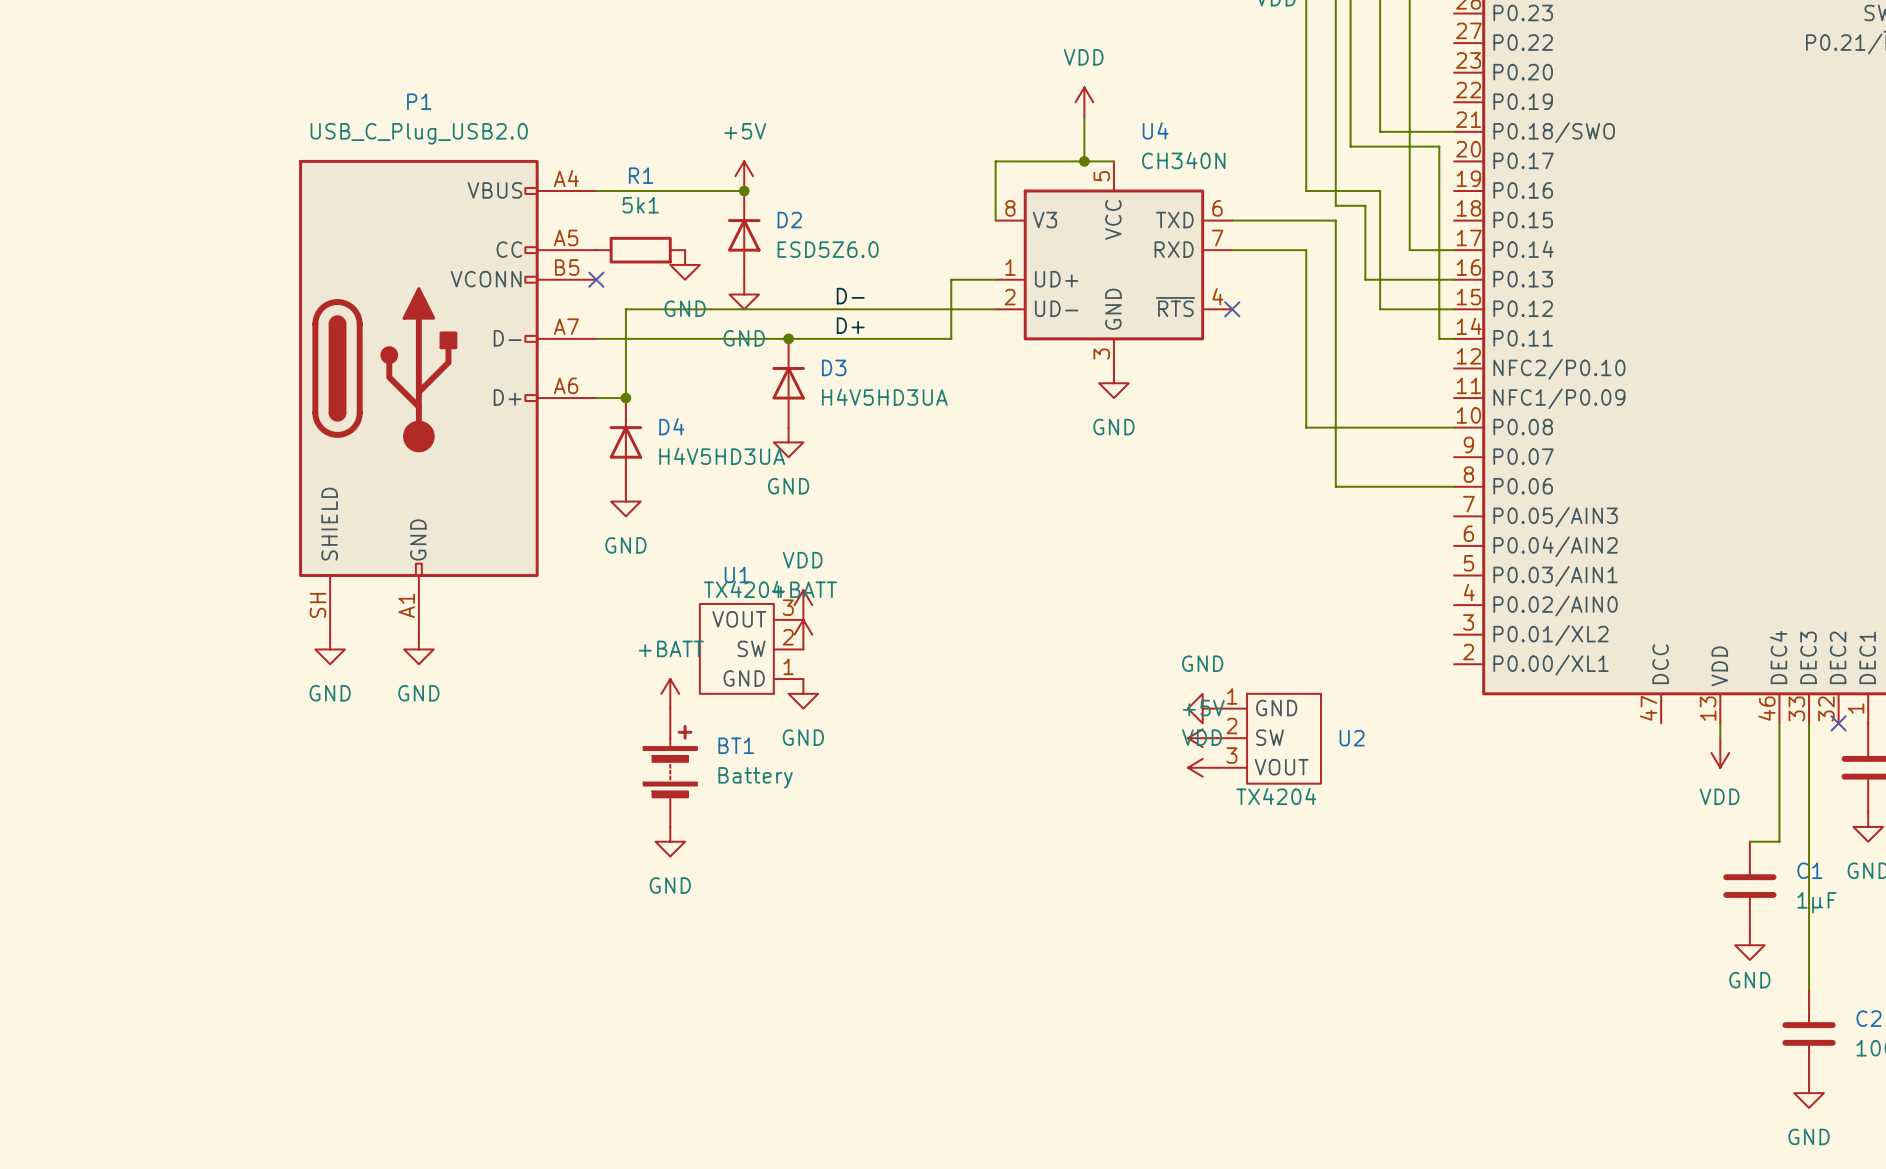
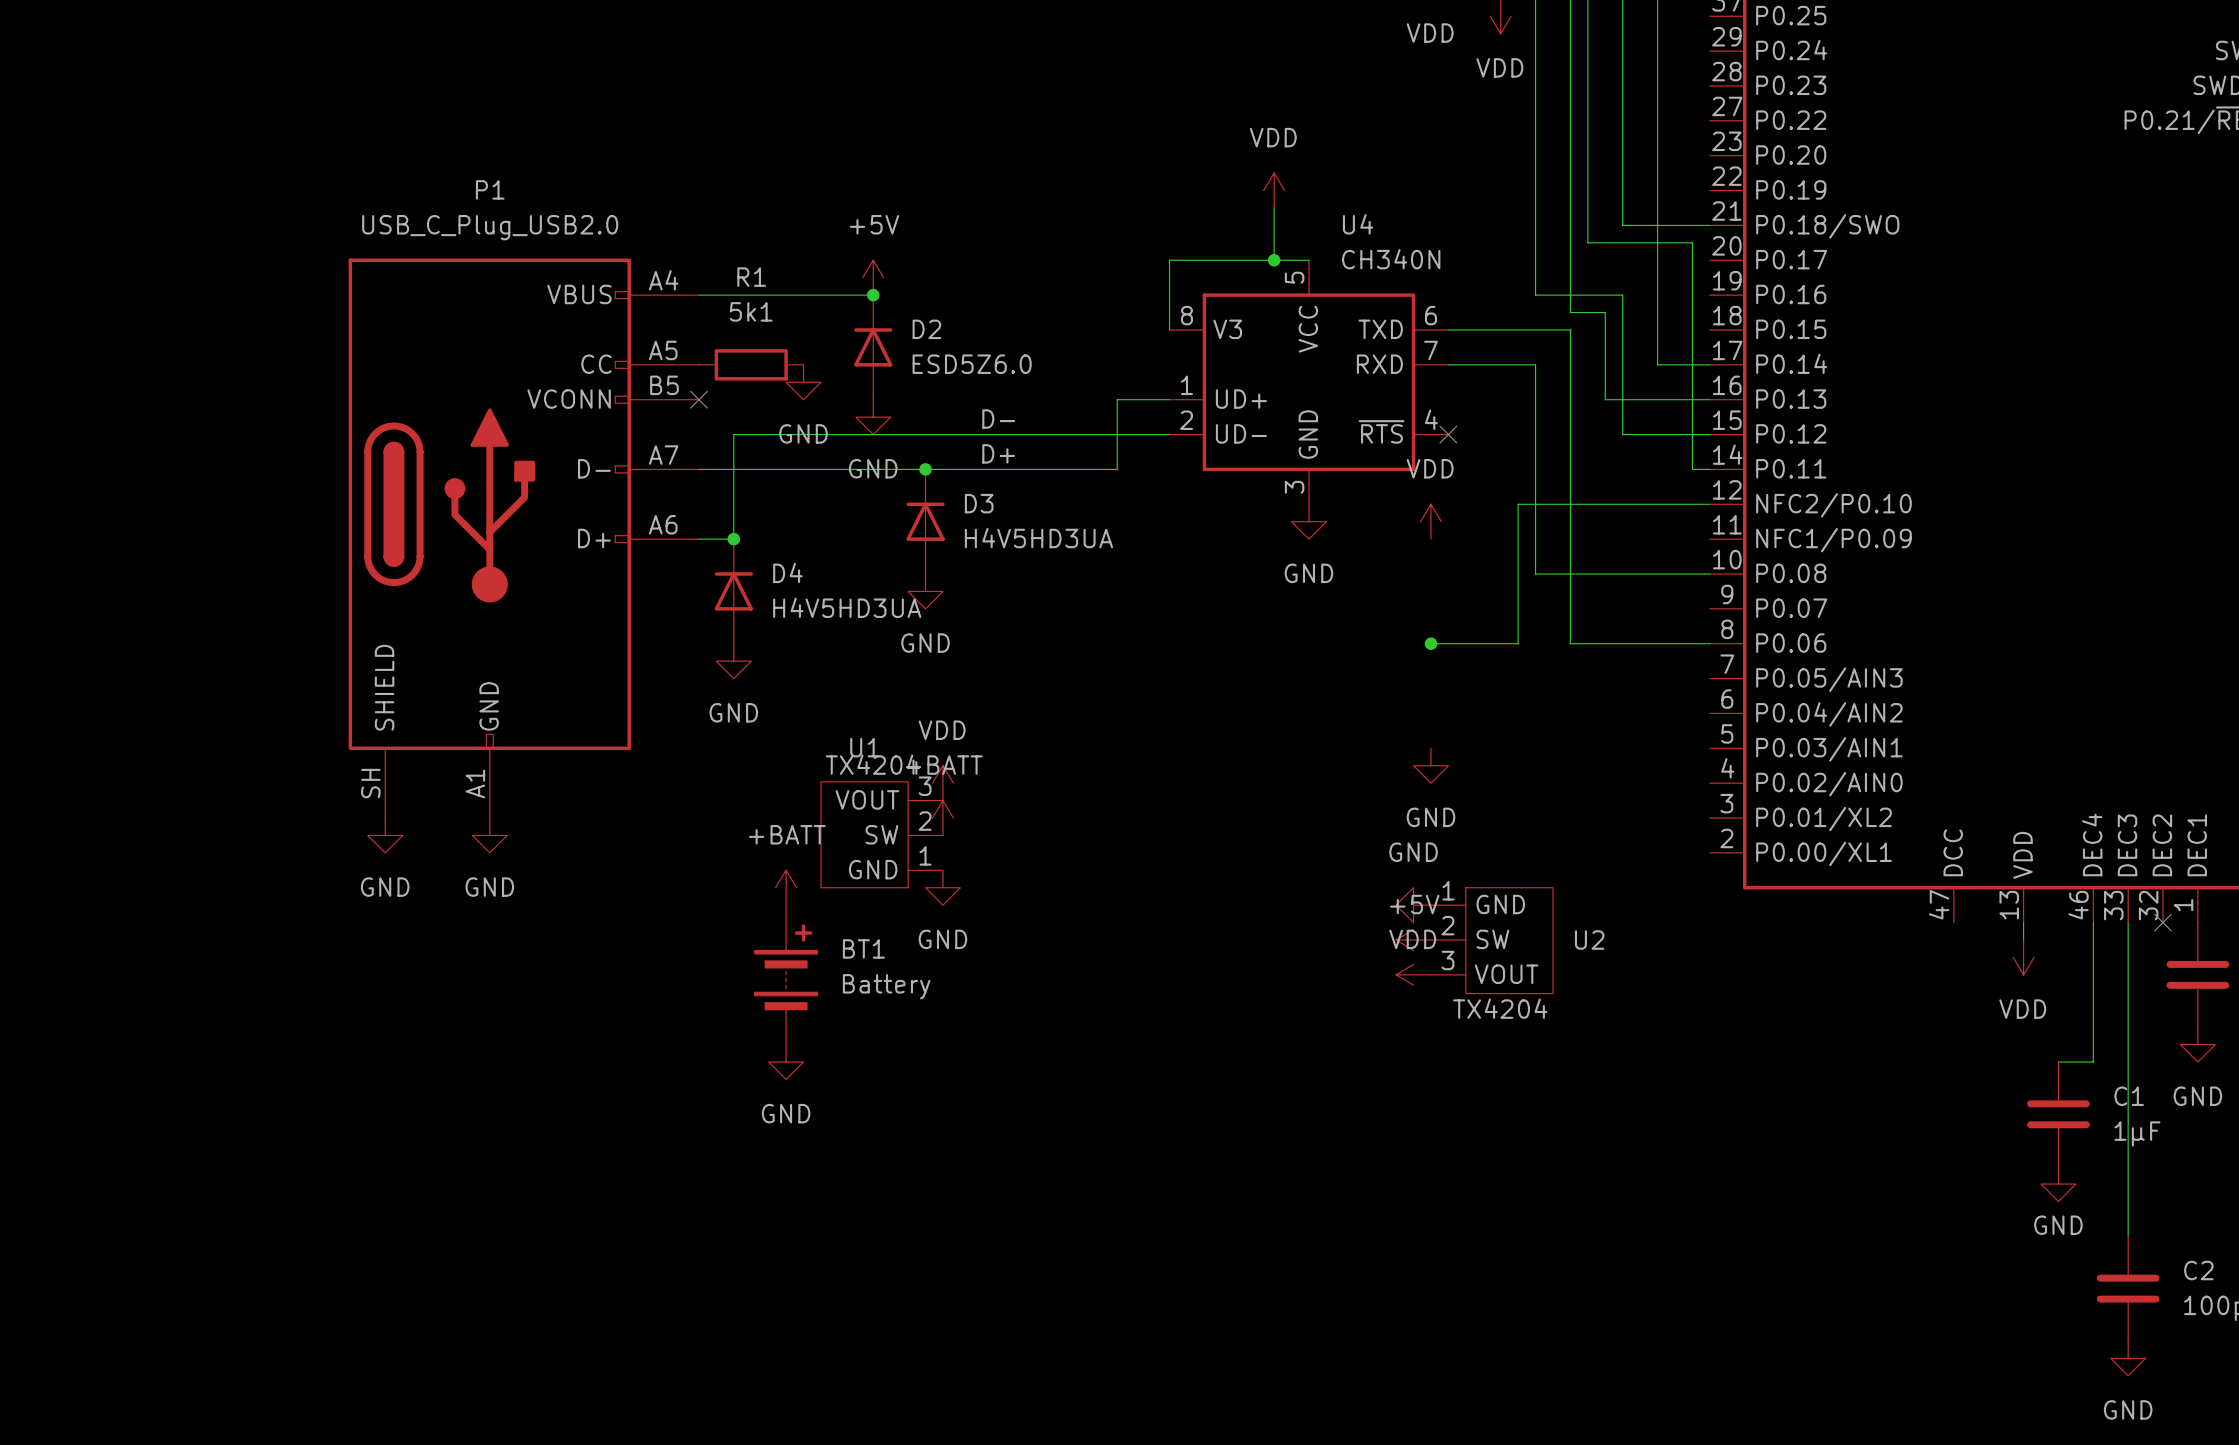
wire: none -> (1709, 504) (1518, 504) (1518, 643) (1430, 643)
power symbol: none -> VDD (1430, 521)
junction: none -> (1430, 643)
power symbol: none -> GND (1430, 765)

